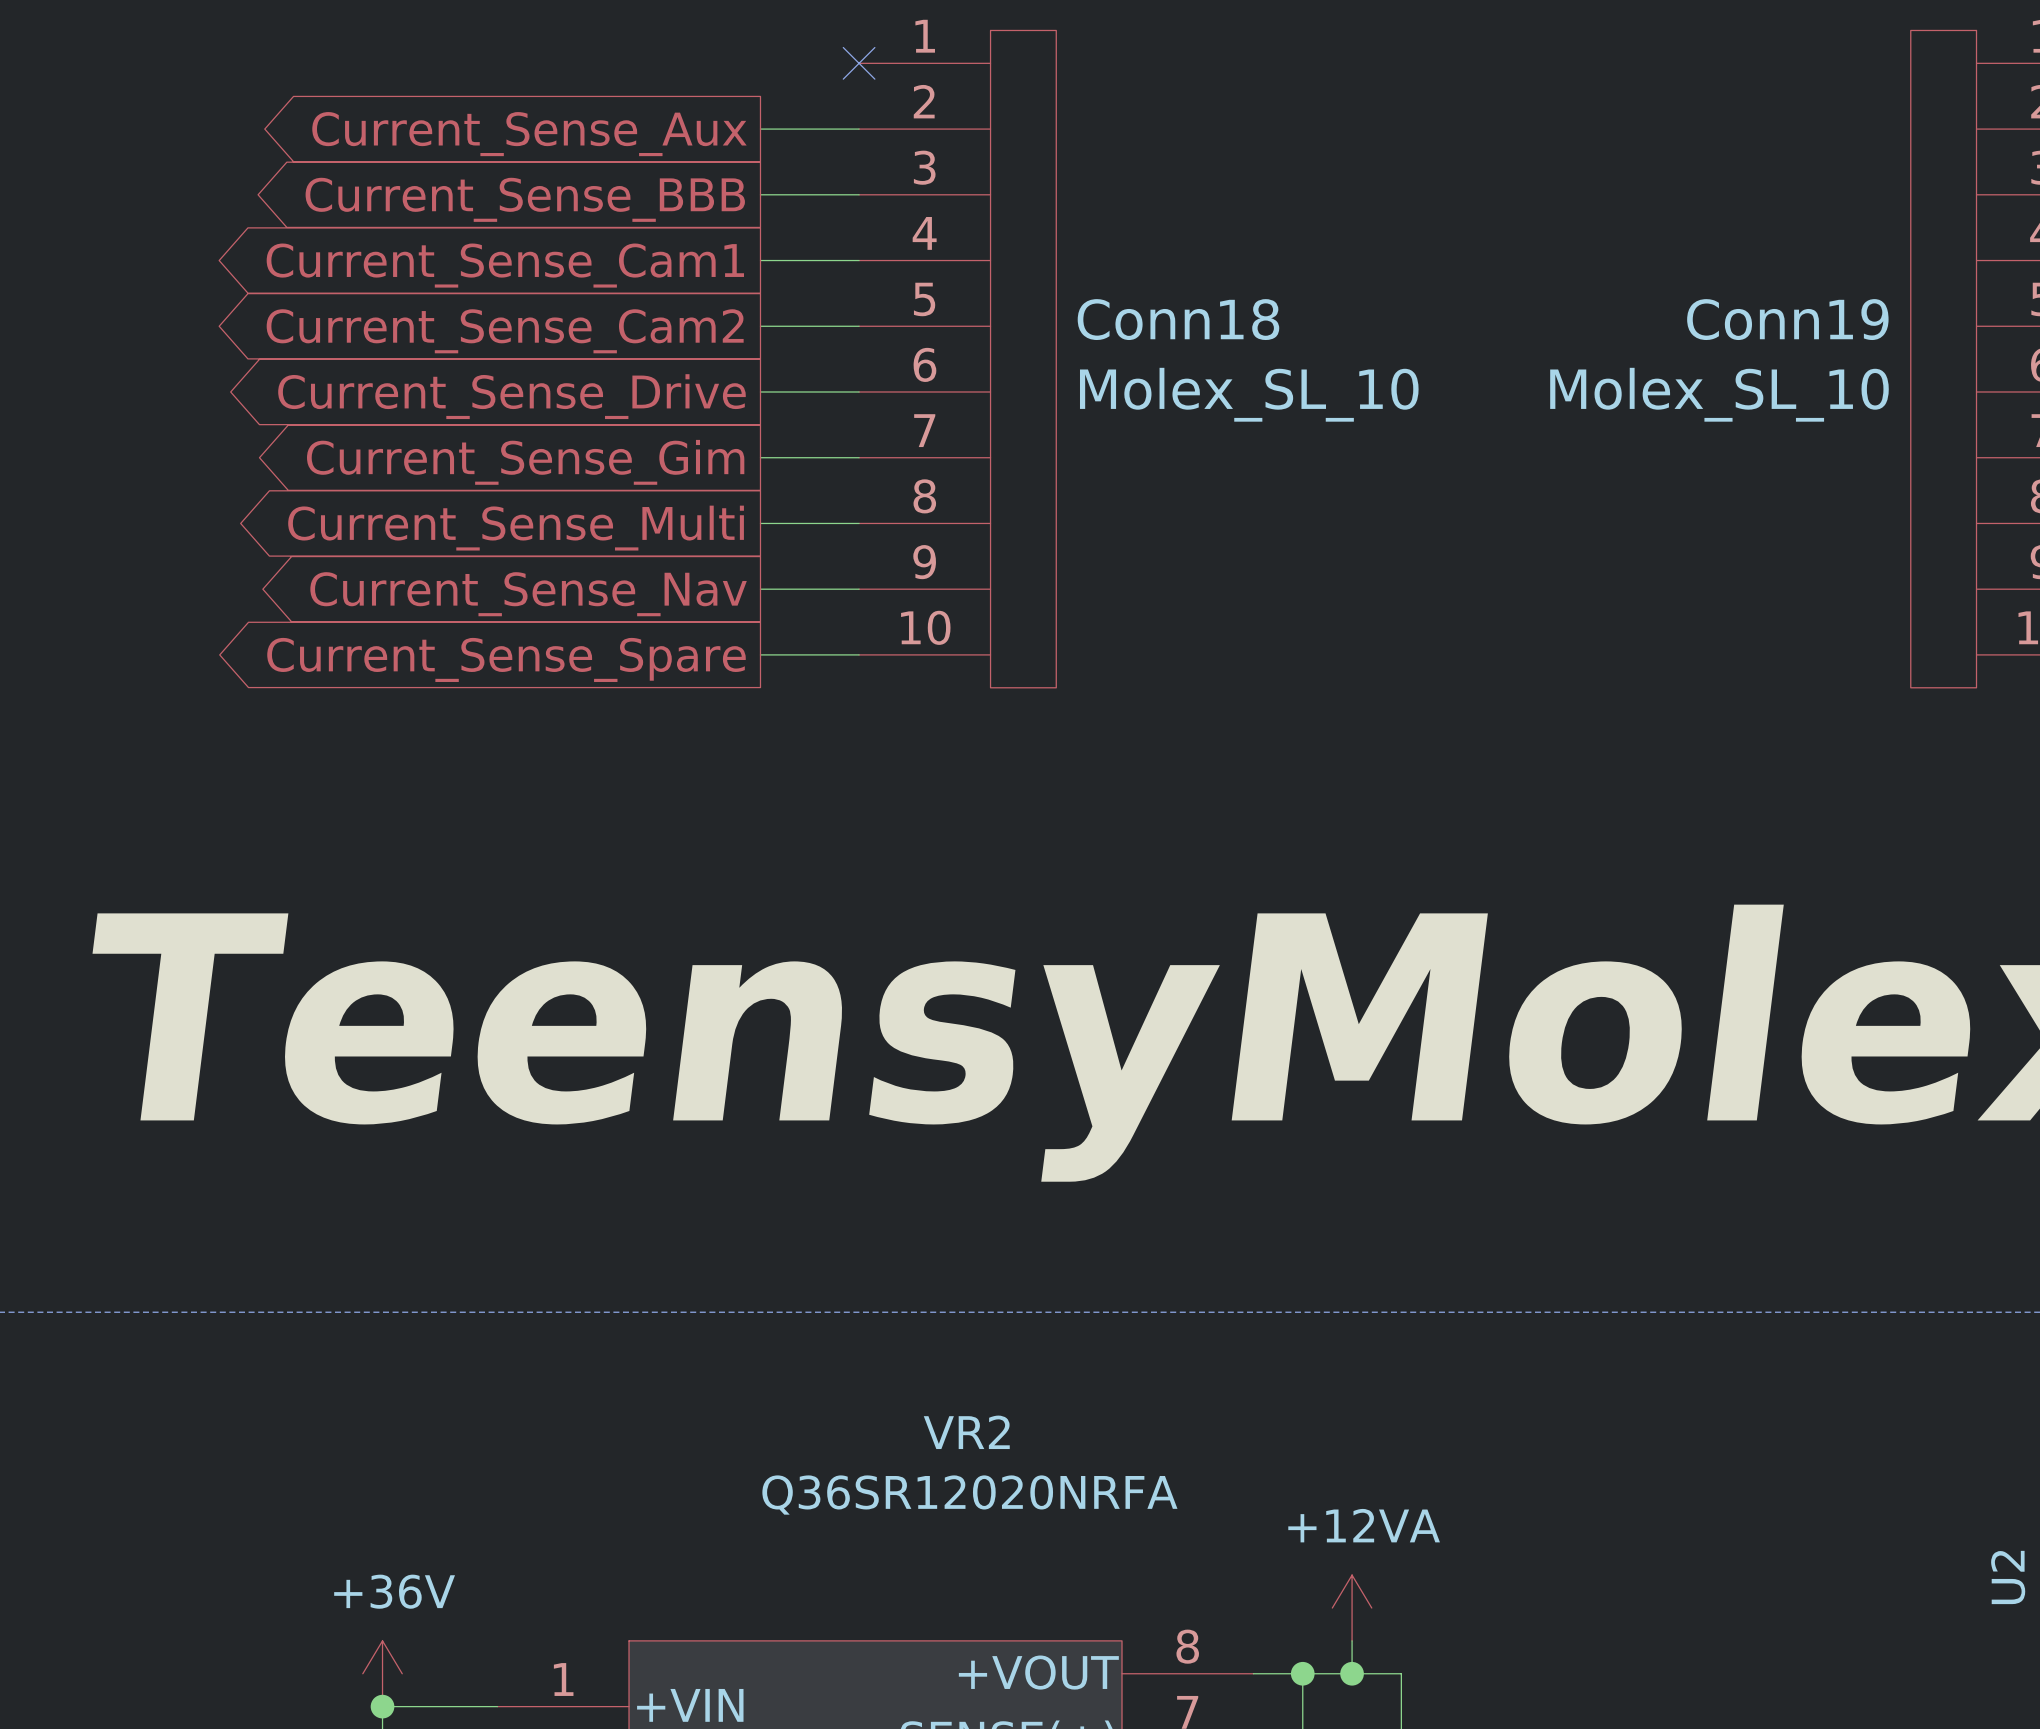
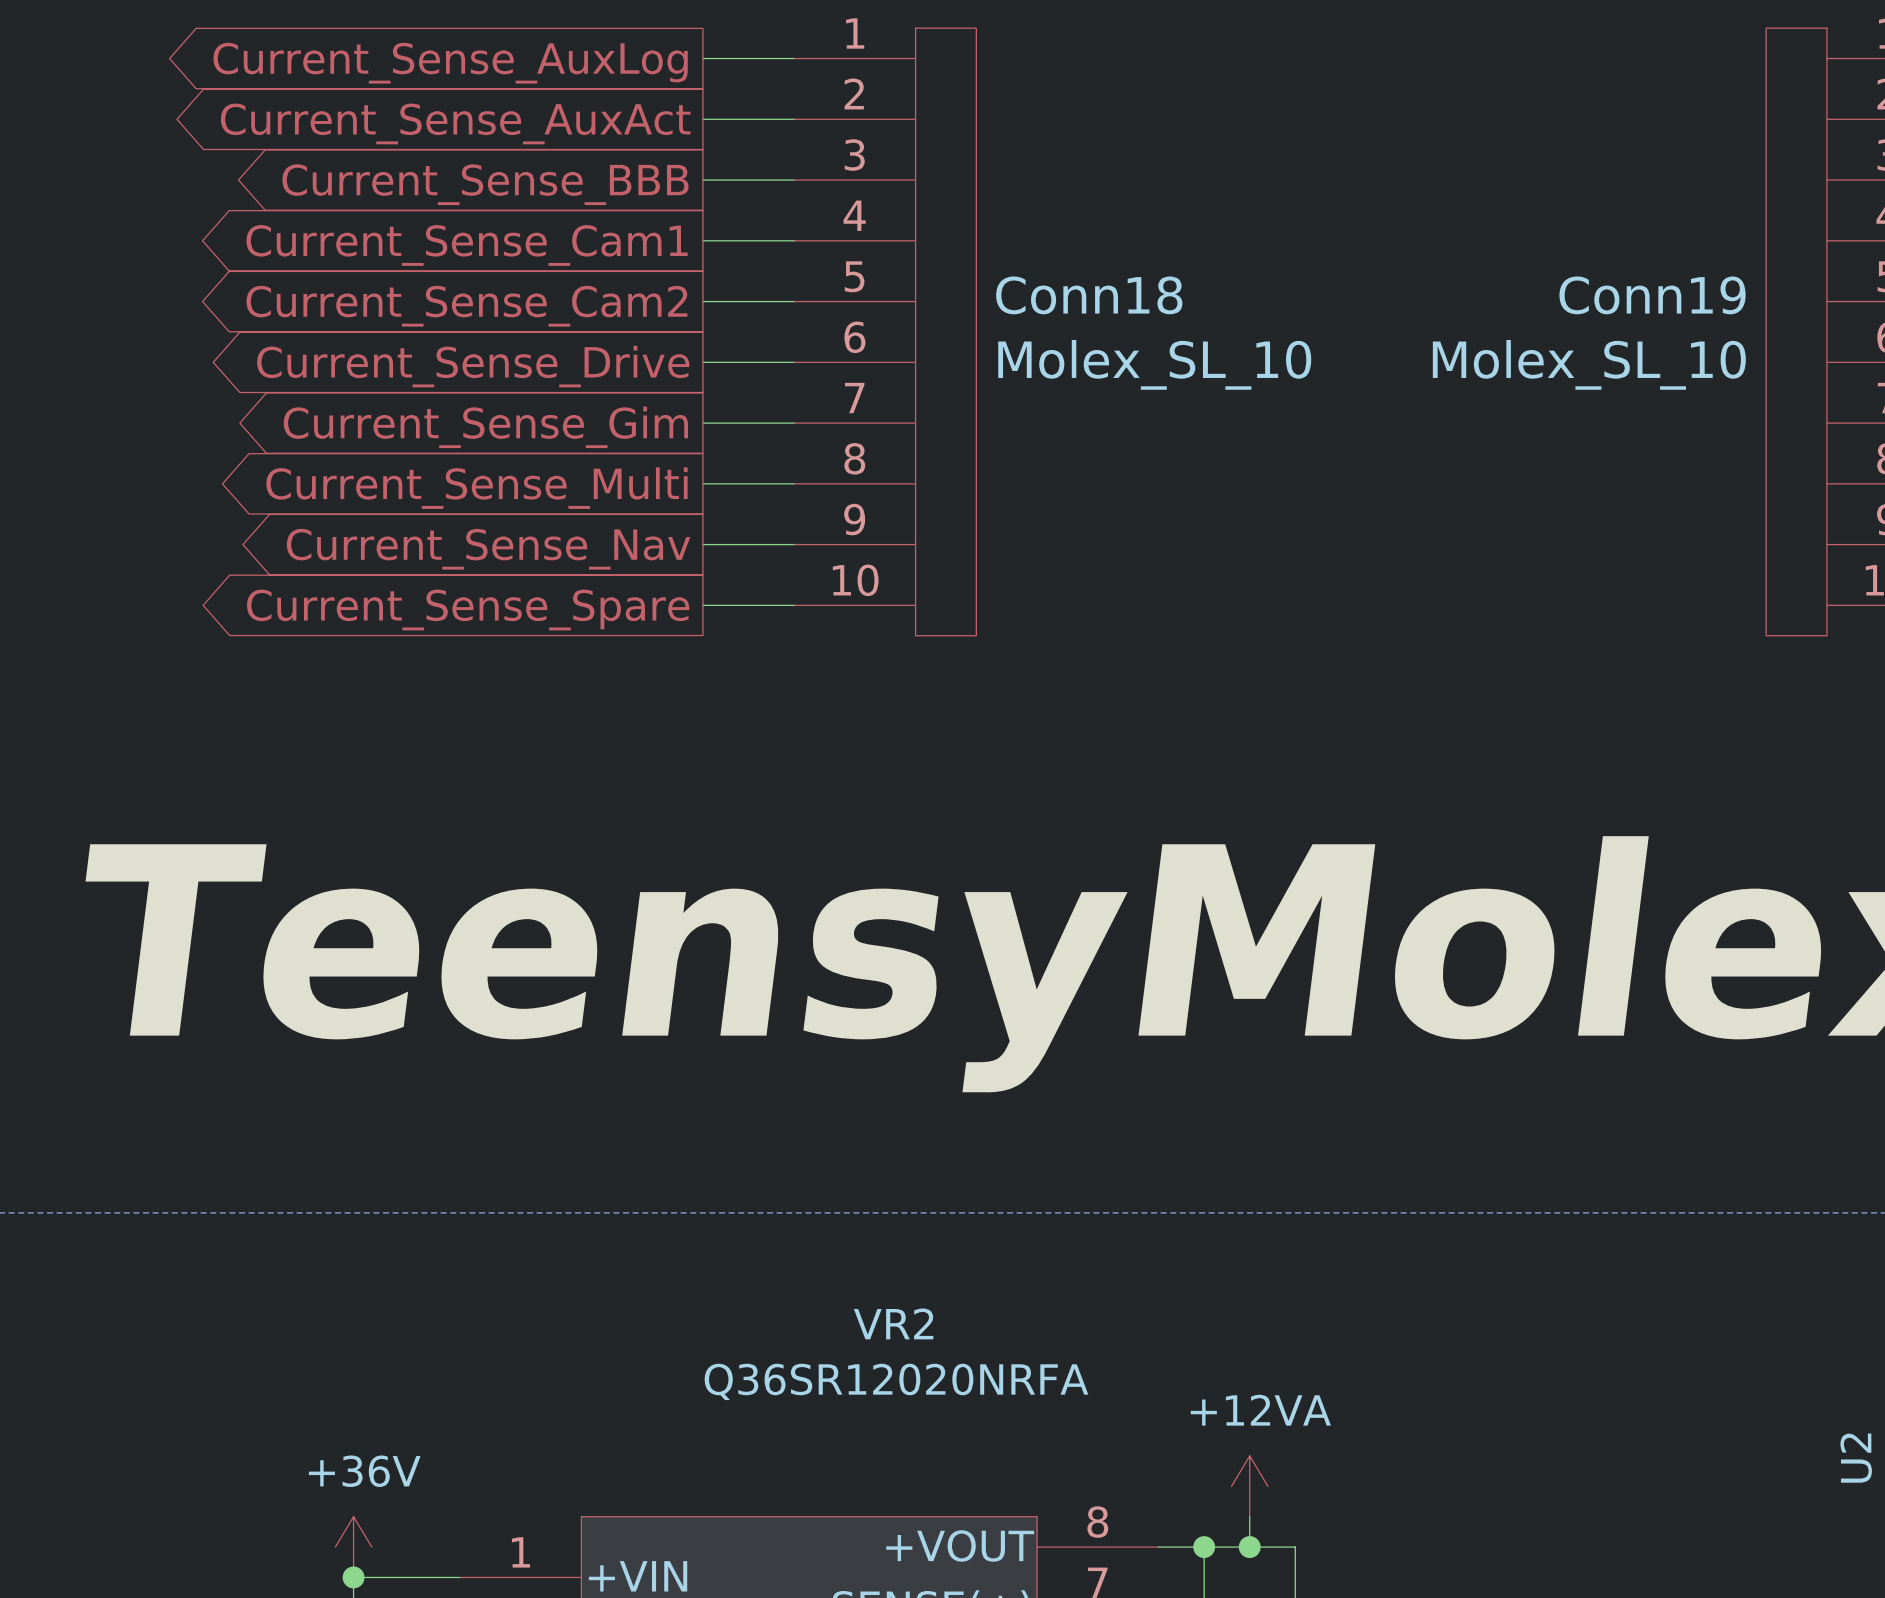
wire: none -> (702, 58) (794, 58)
no-connect mark: (859, 63) -> none
global label: none -> Current_Sense_AuxLog (450, 63)
global label: Current_Sense_Aux (529, 134) -> Current_Sense_AuxAct (455, 123)

